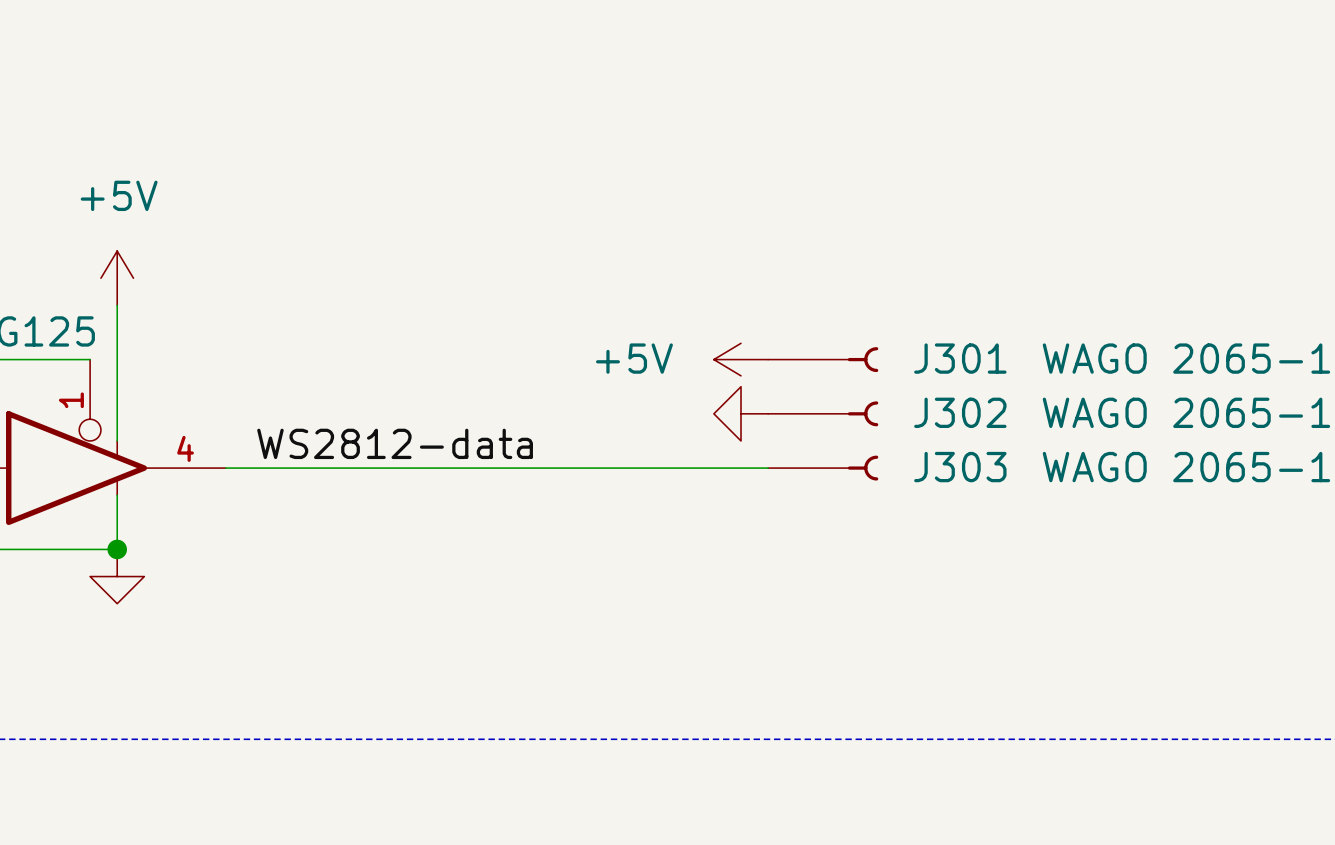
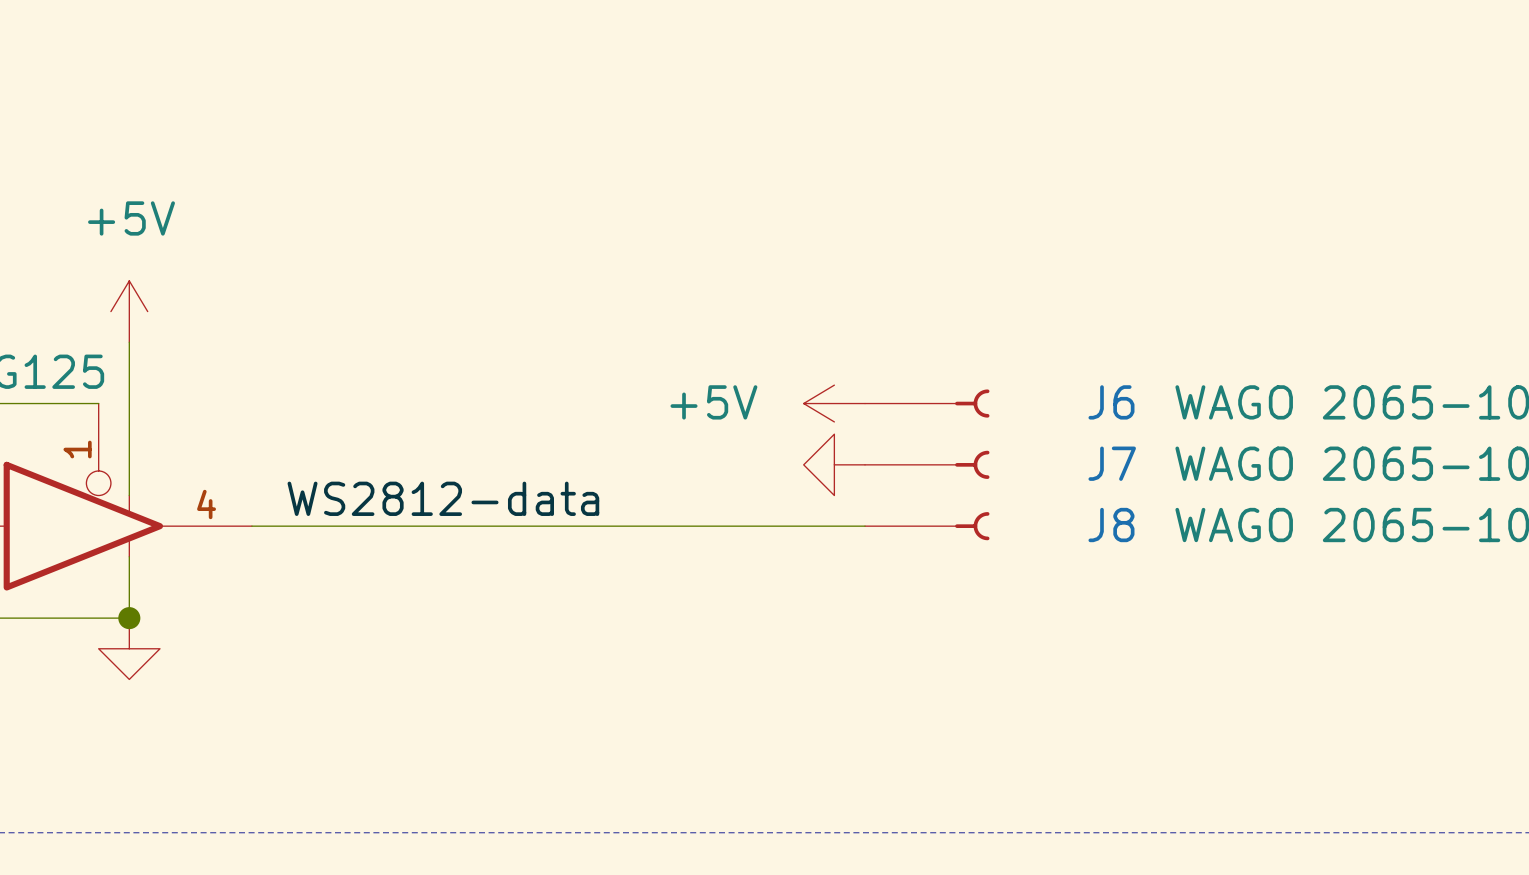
J301 name: J301 (960, 358) -> J6 (1111, 402)
J302 name: J302 (960, 412) -> J7 (1112, 463)
J303 name: J303 (960, 467) -> J8 (1111, 525)

